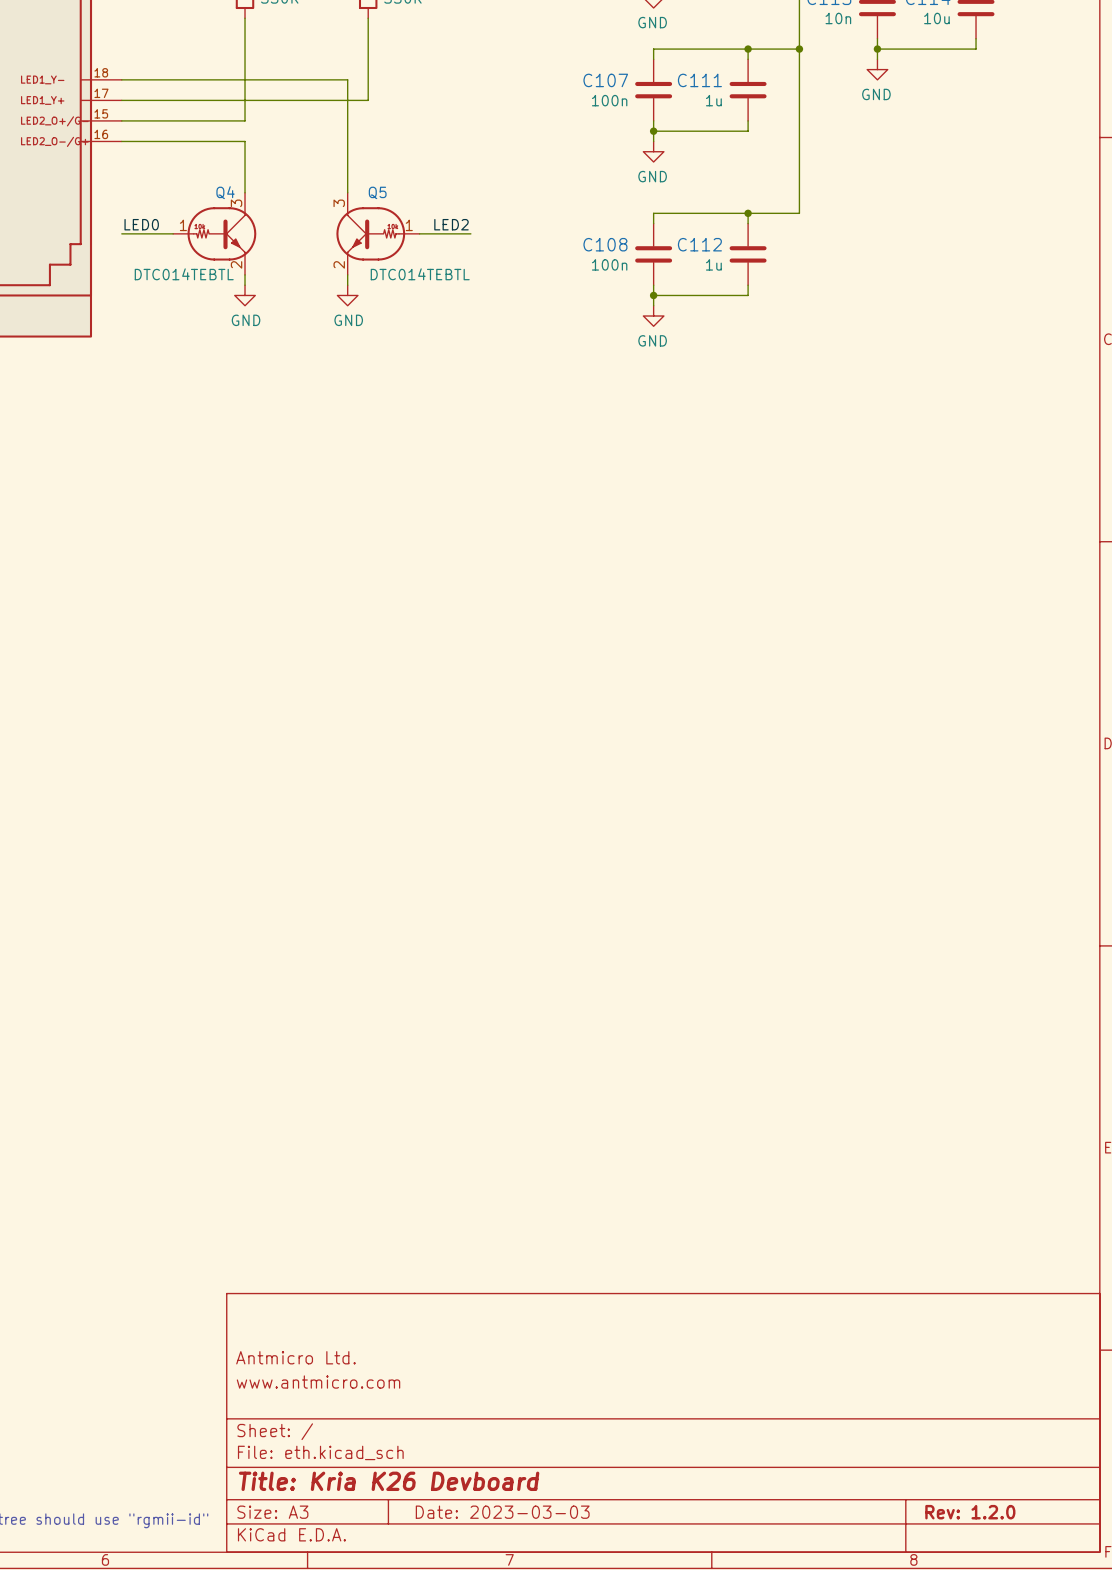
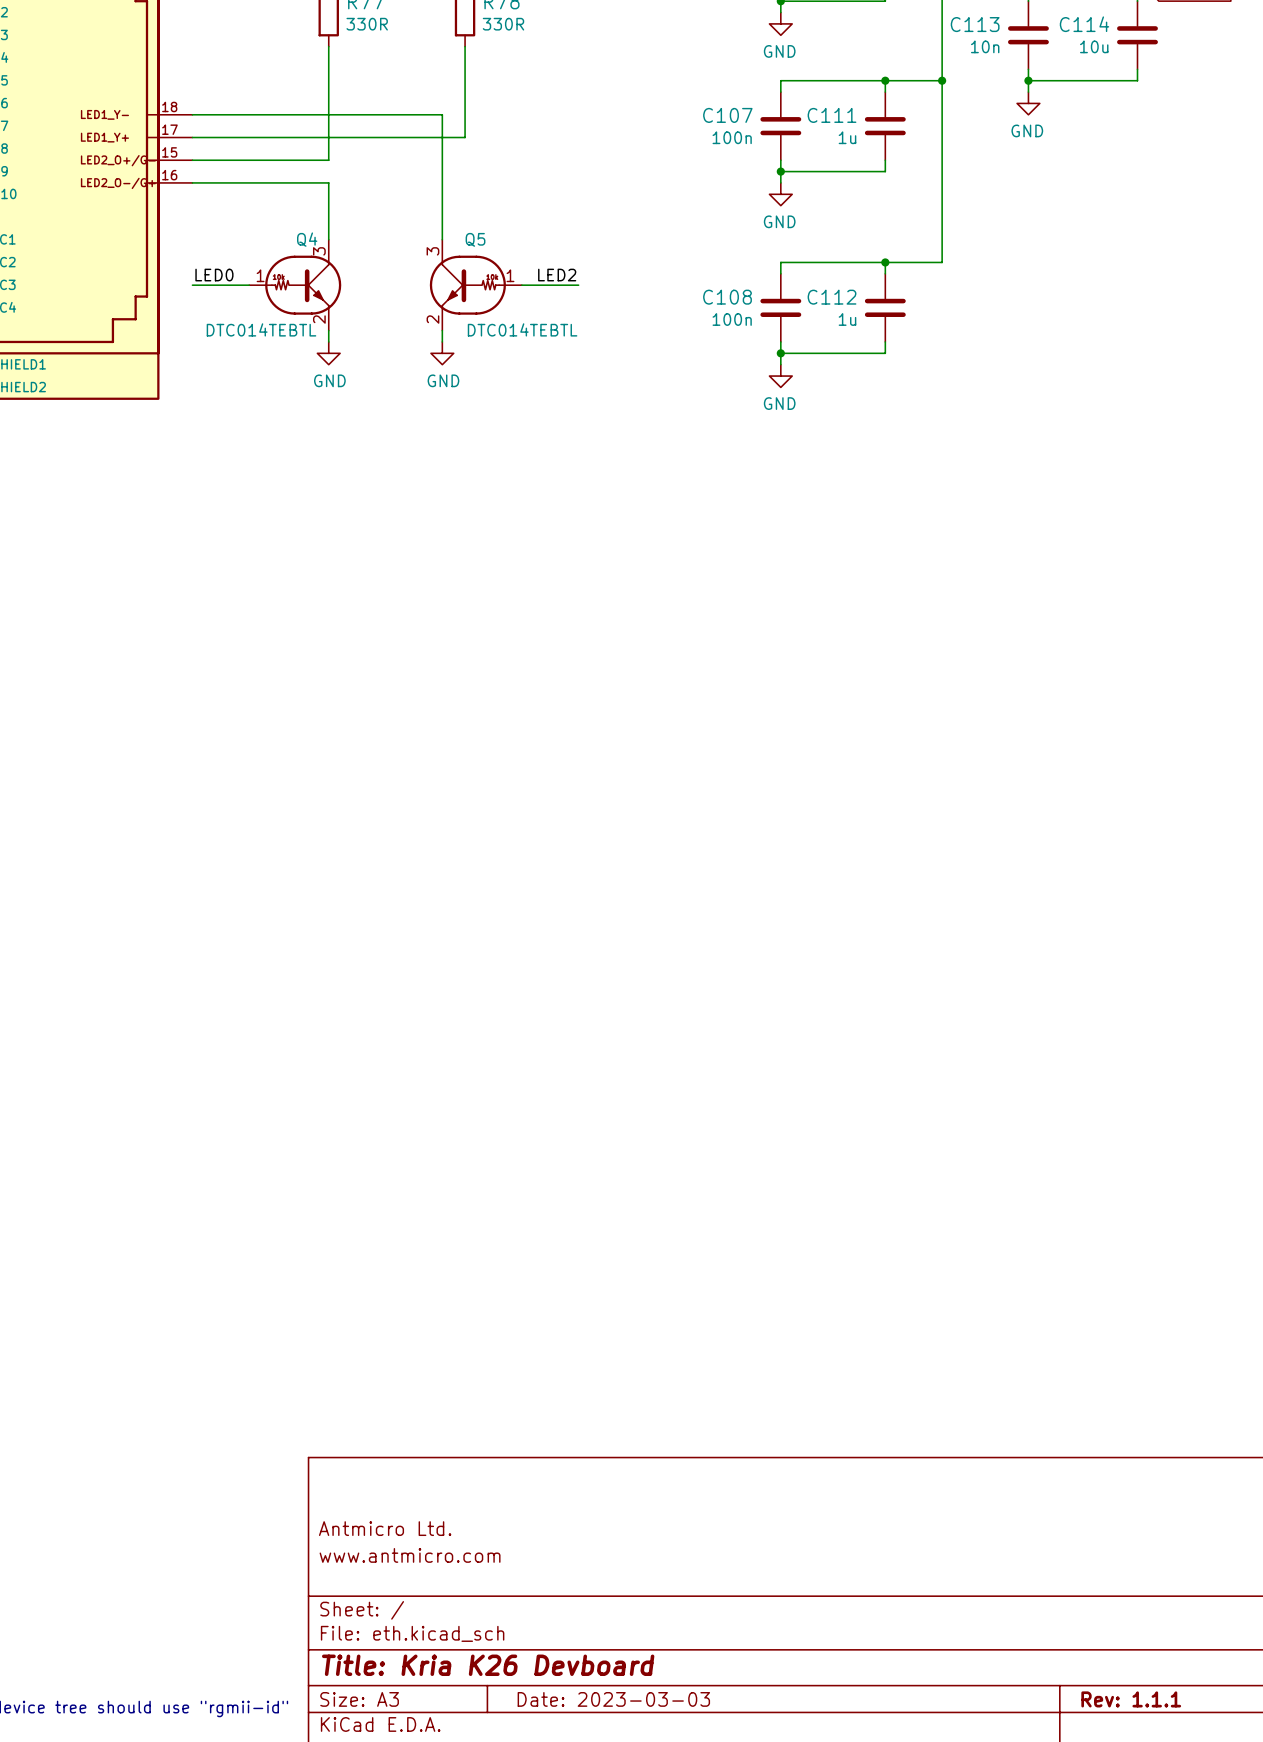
title block: Rev: 1.2.0 (970, 1512) -> Rev: 1.1.1 (1131, 1699)

